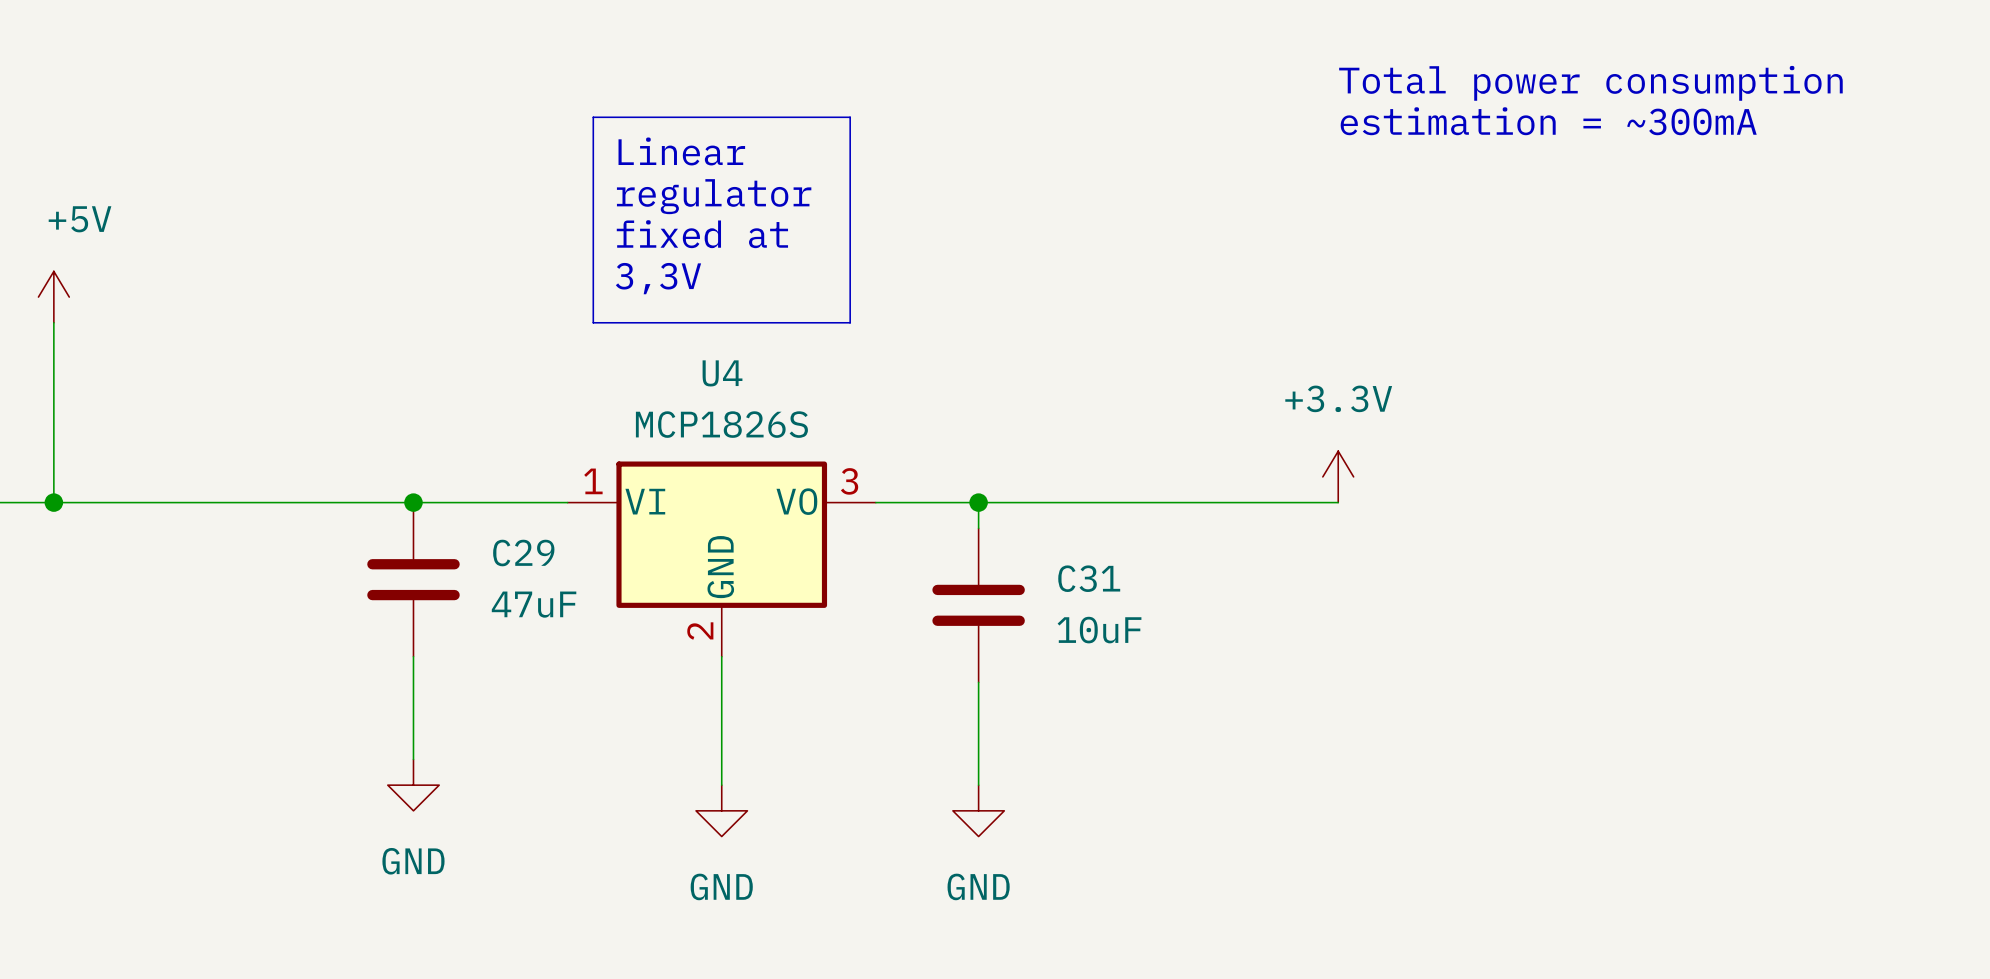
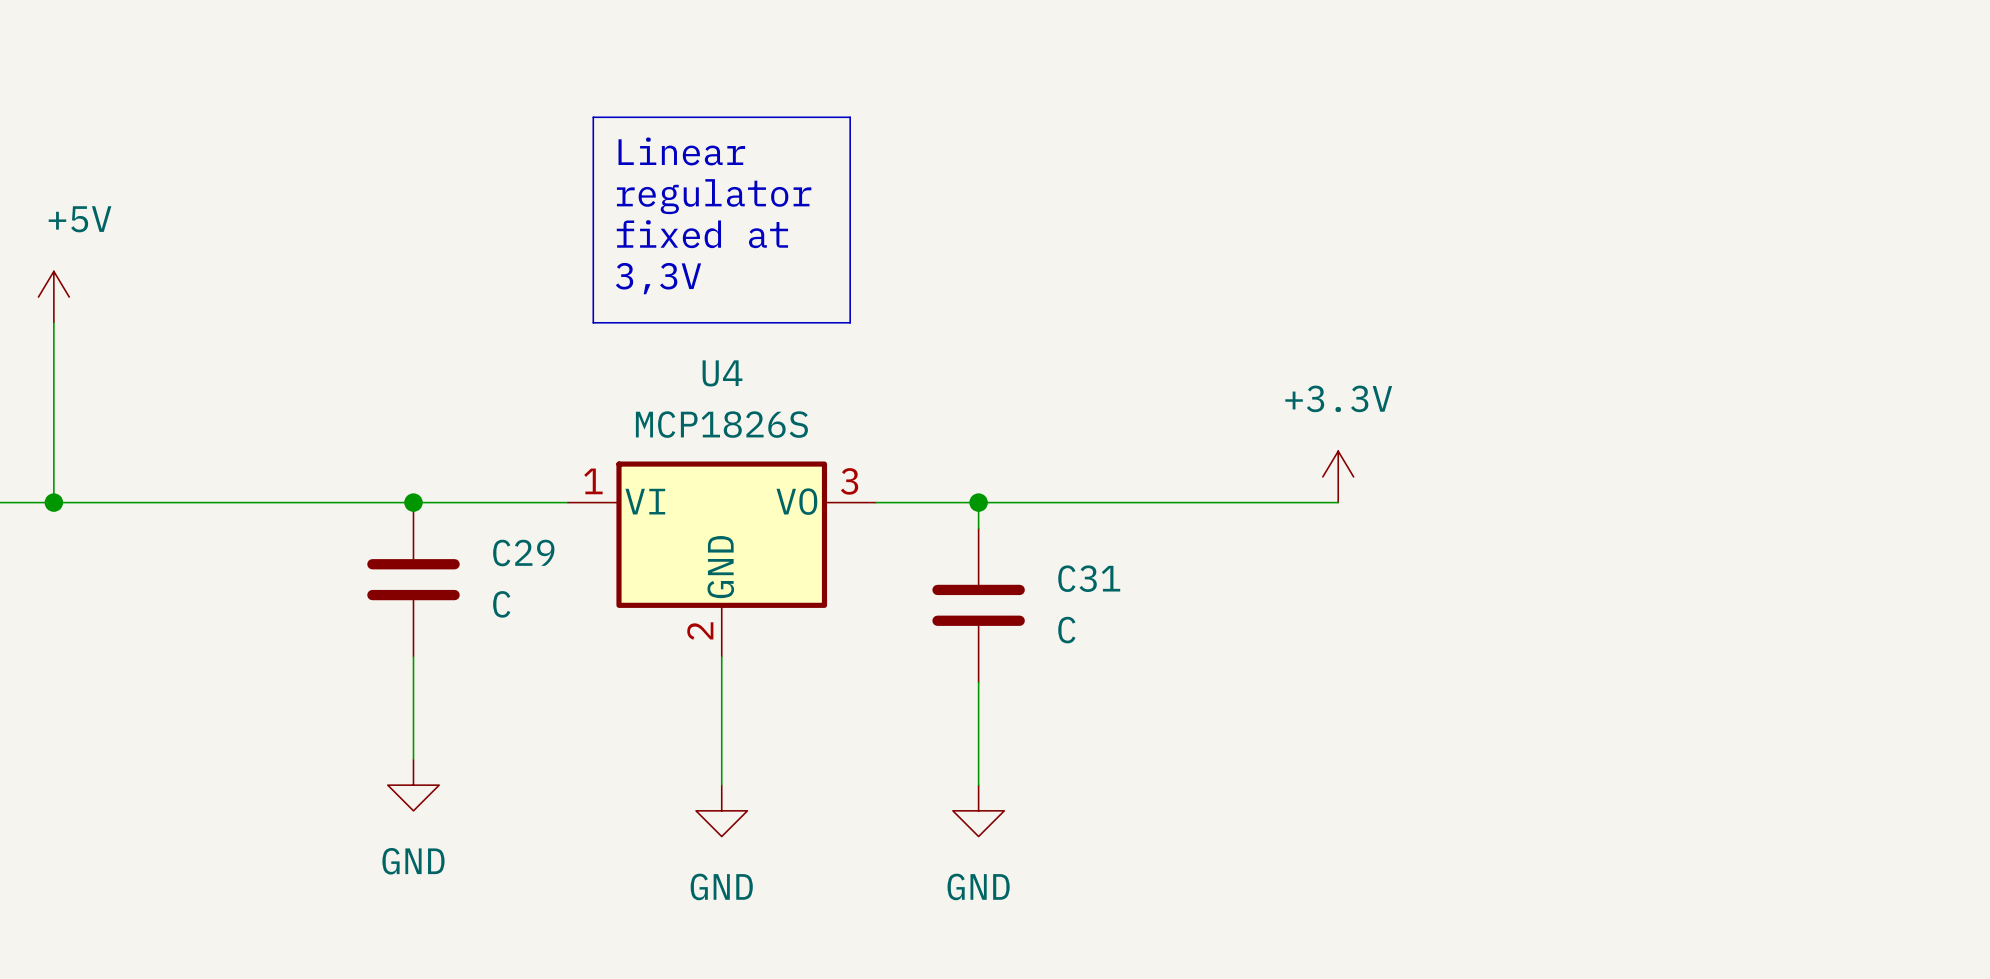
text: Total power consumption (1590, 83) -> none
text: estimation = ~300mA (1548, 121) -> none
C29 value: 47uF (534, 604) -> C (501, 604)
C31 value: 10uF (1099, 630) -> C (1066, 630)

